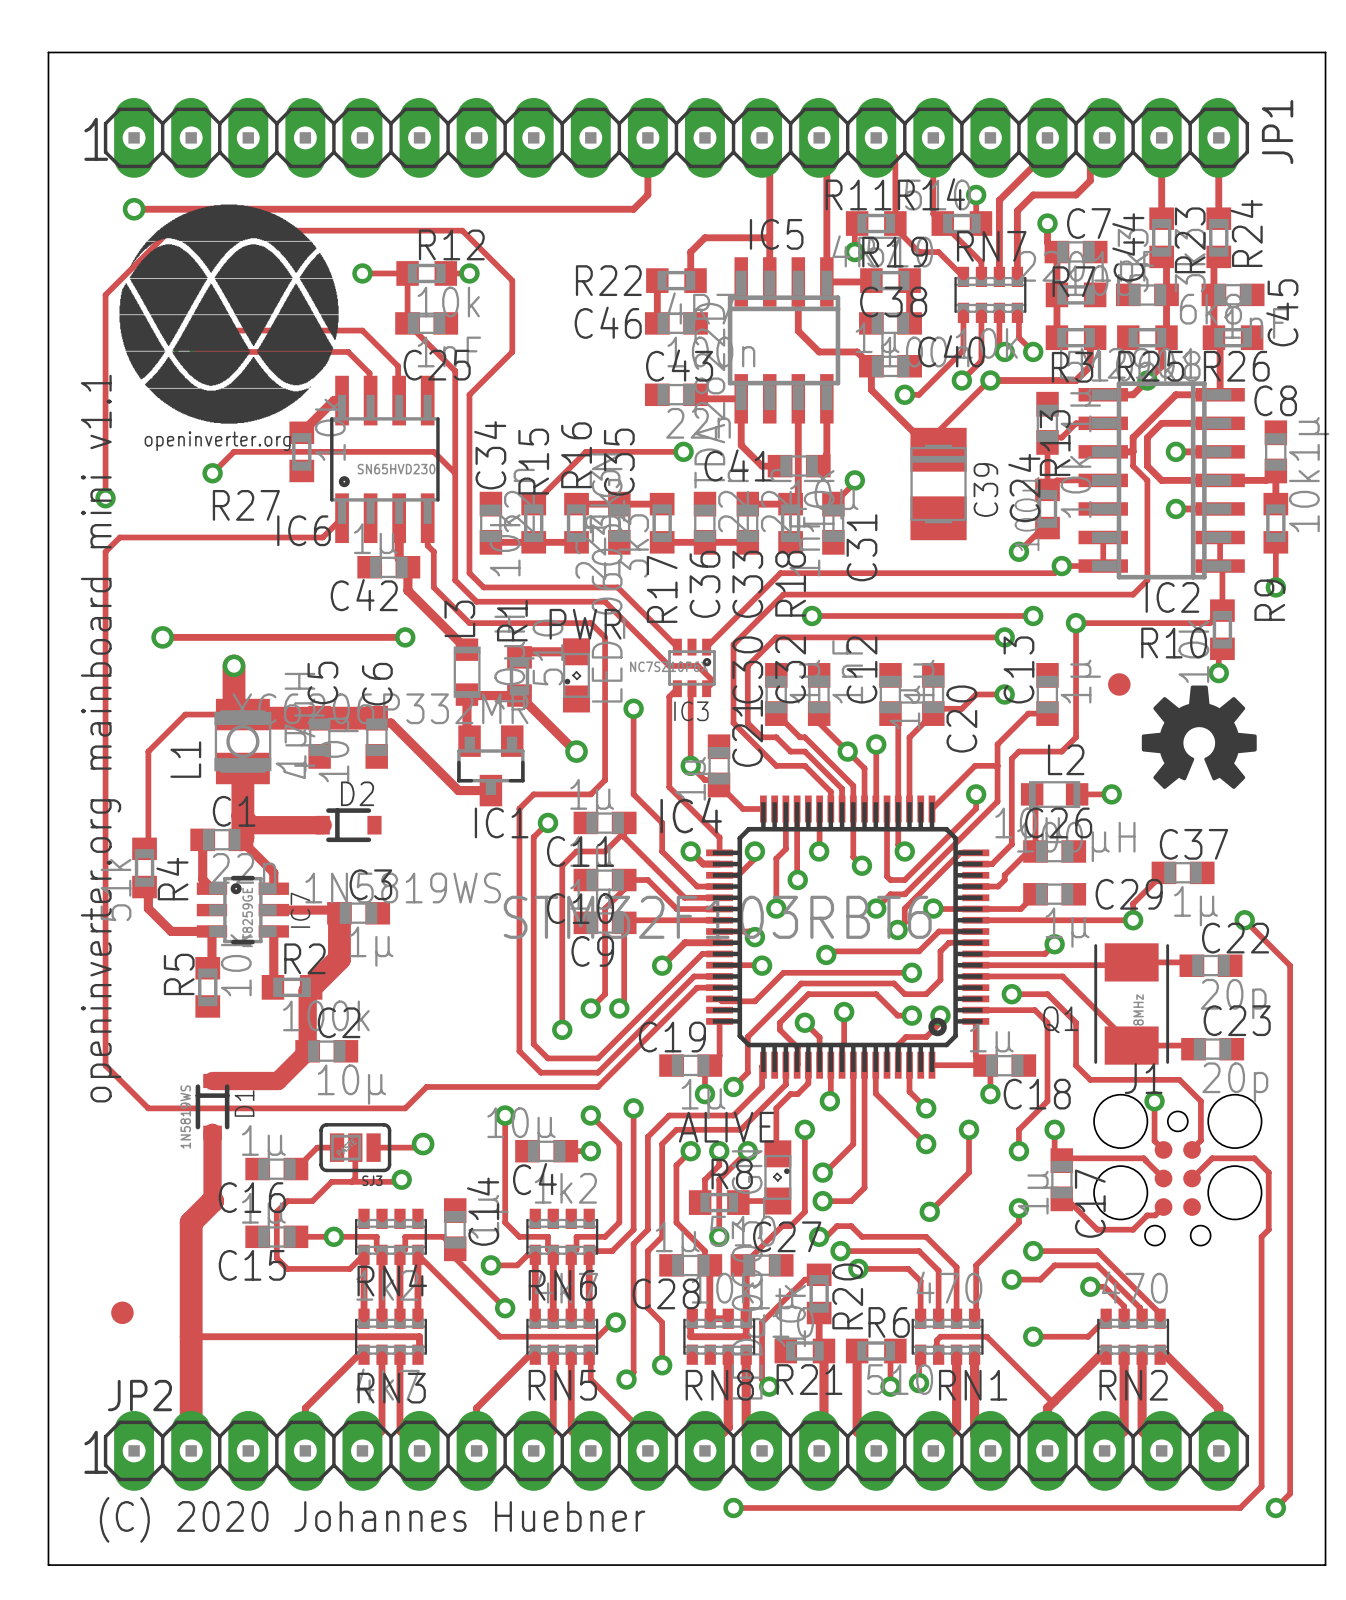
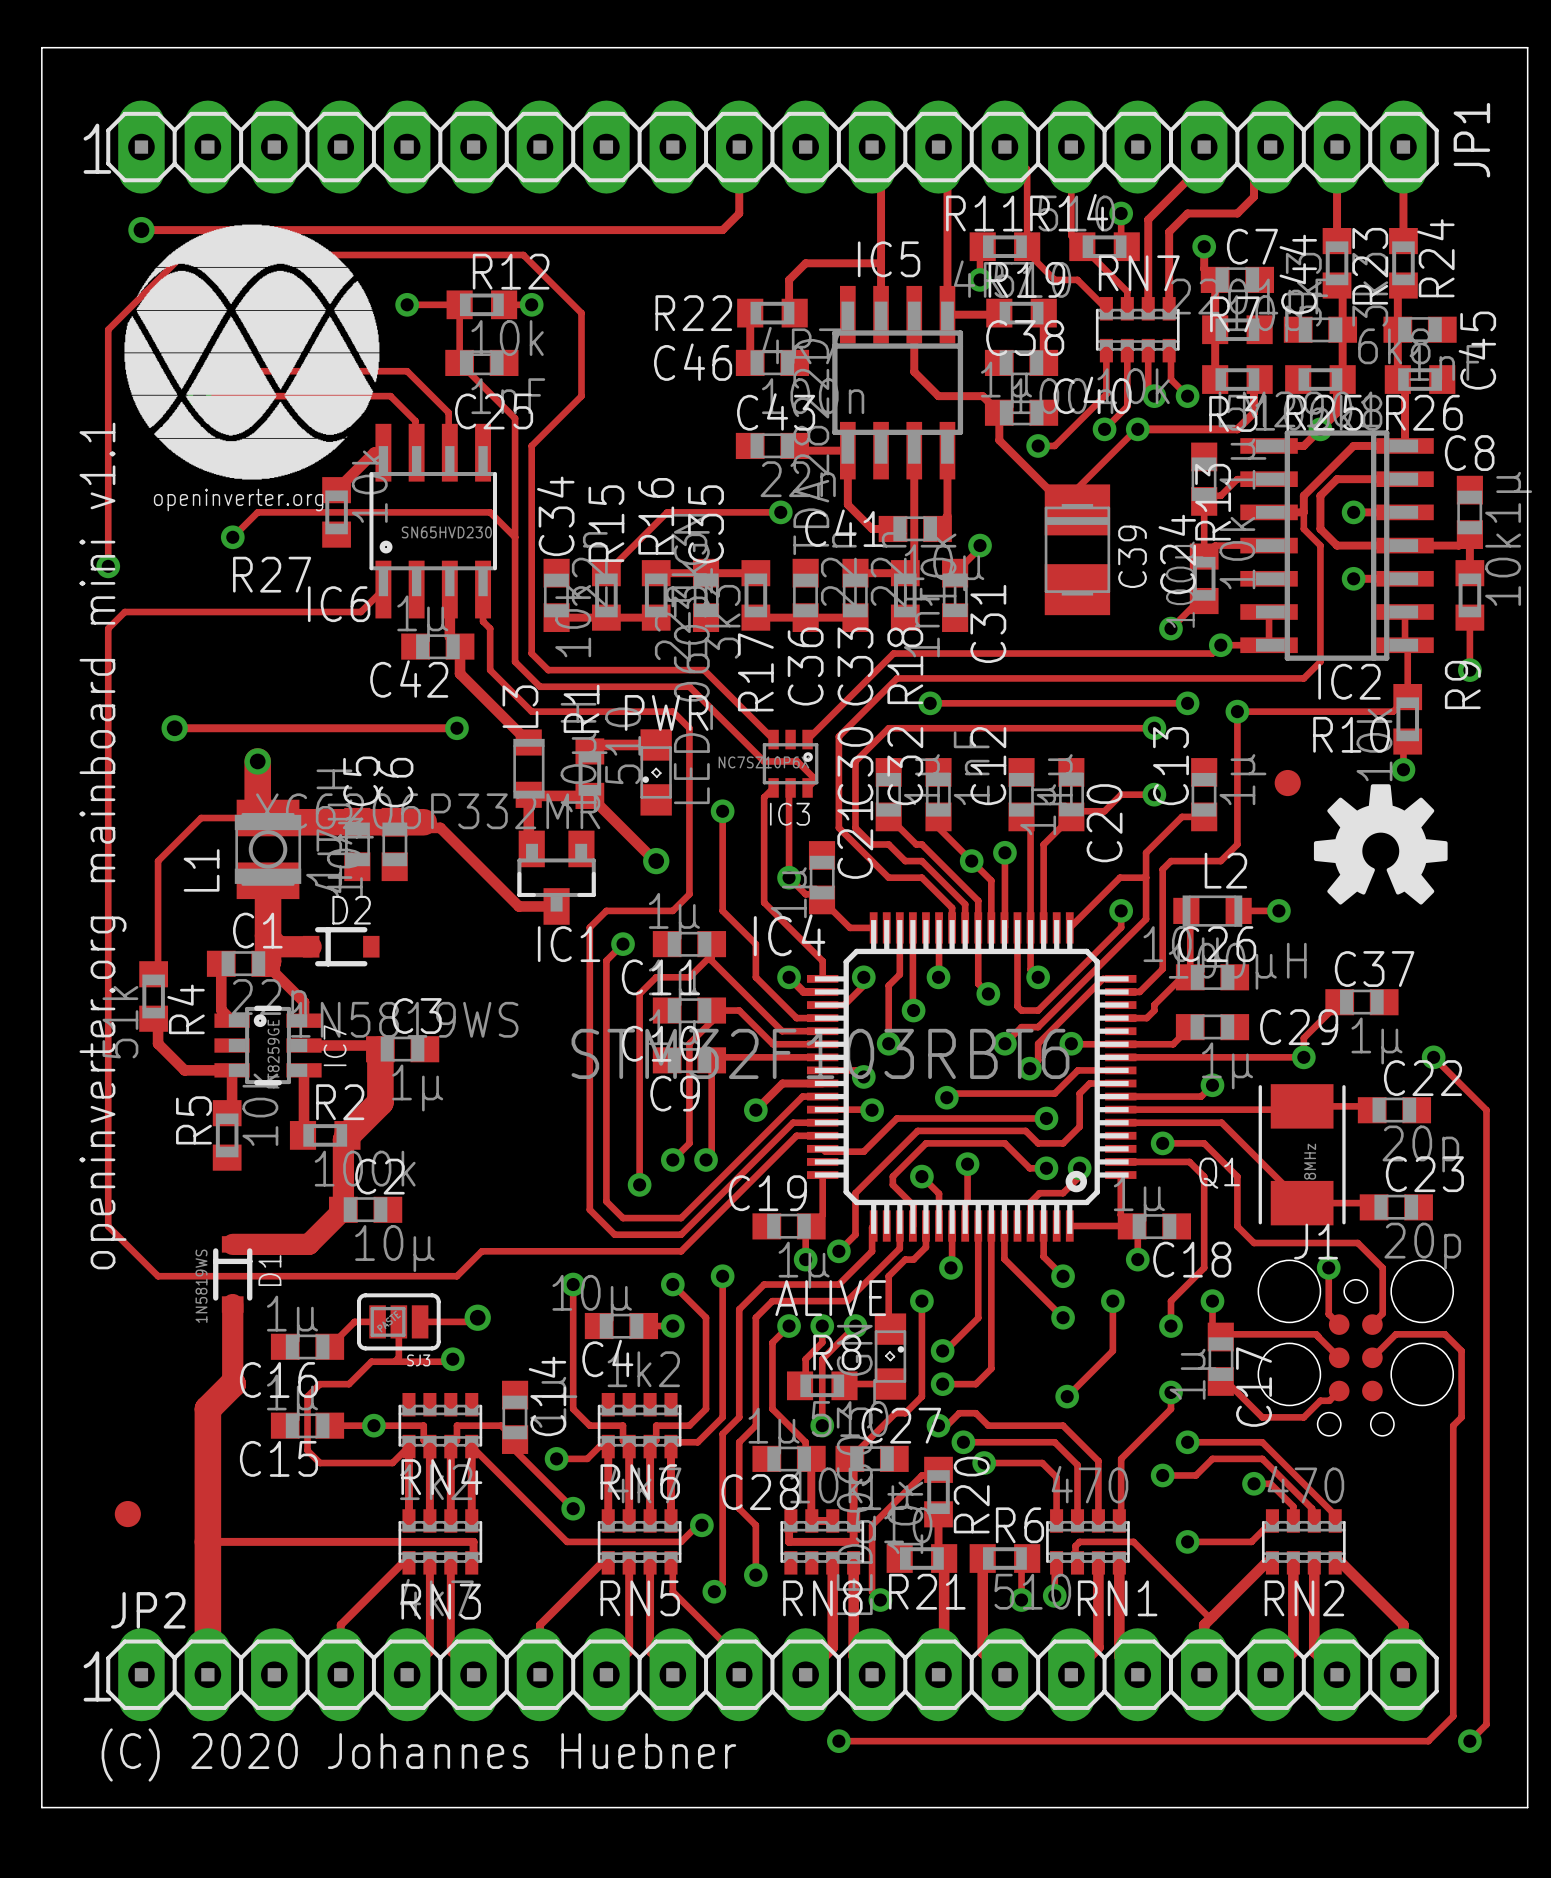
C6 position: (376, 737) -> (394, 844)
track: (279, 825) (322, 825) -> none
D2 position: (348, 825) -> (341, 946)

